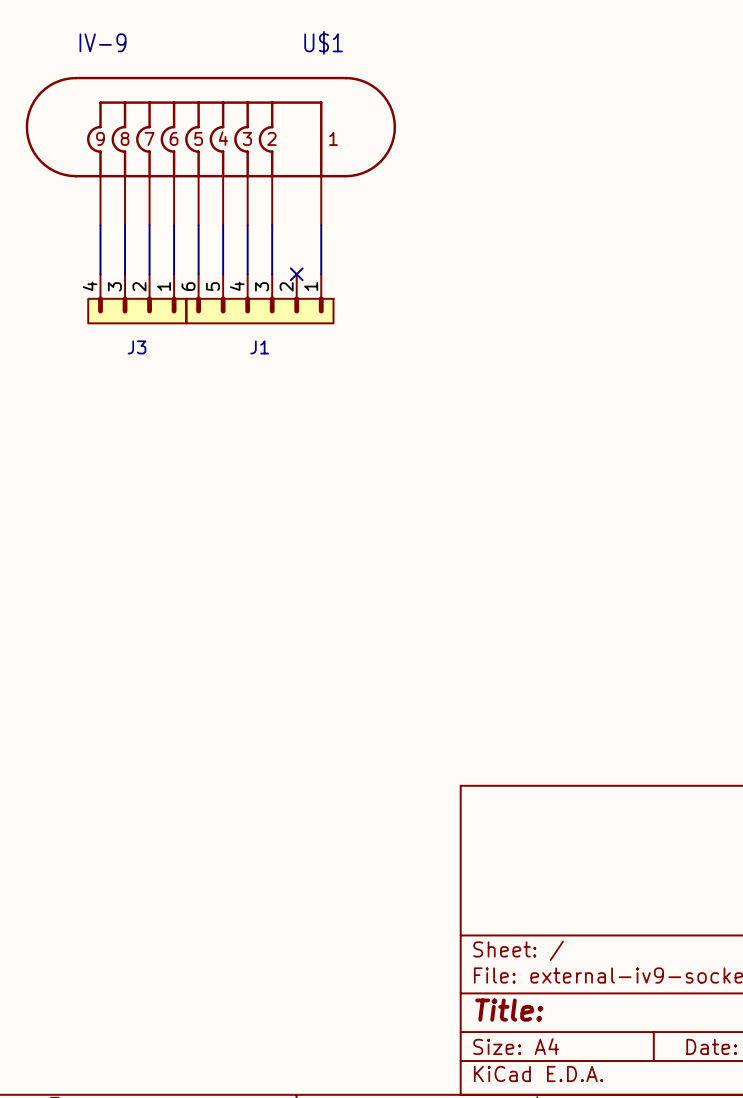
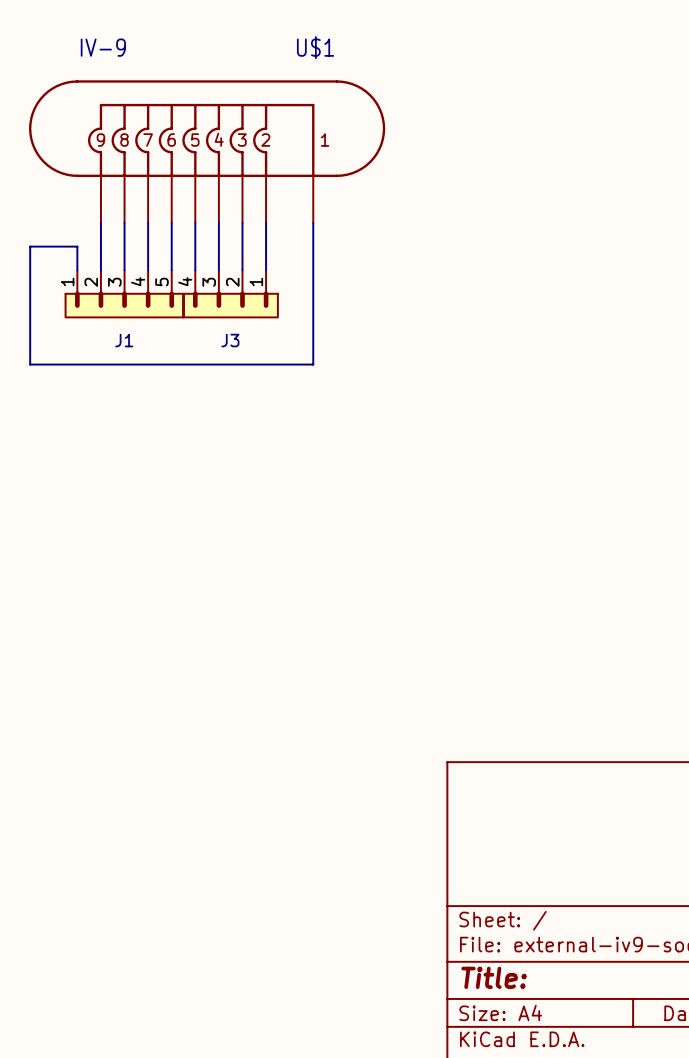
wire: none -> (77, 270) (77, 246) (30, 246) (30, 364) (313, 364) (313, 270)
J1 symbol: [186, 274, 334, 324] -> [65, 270, 184, 318]
no-connect mark: (296, 274) -> none
J3 position: (137, 298) -> (230, 293)

